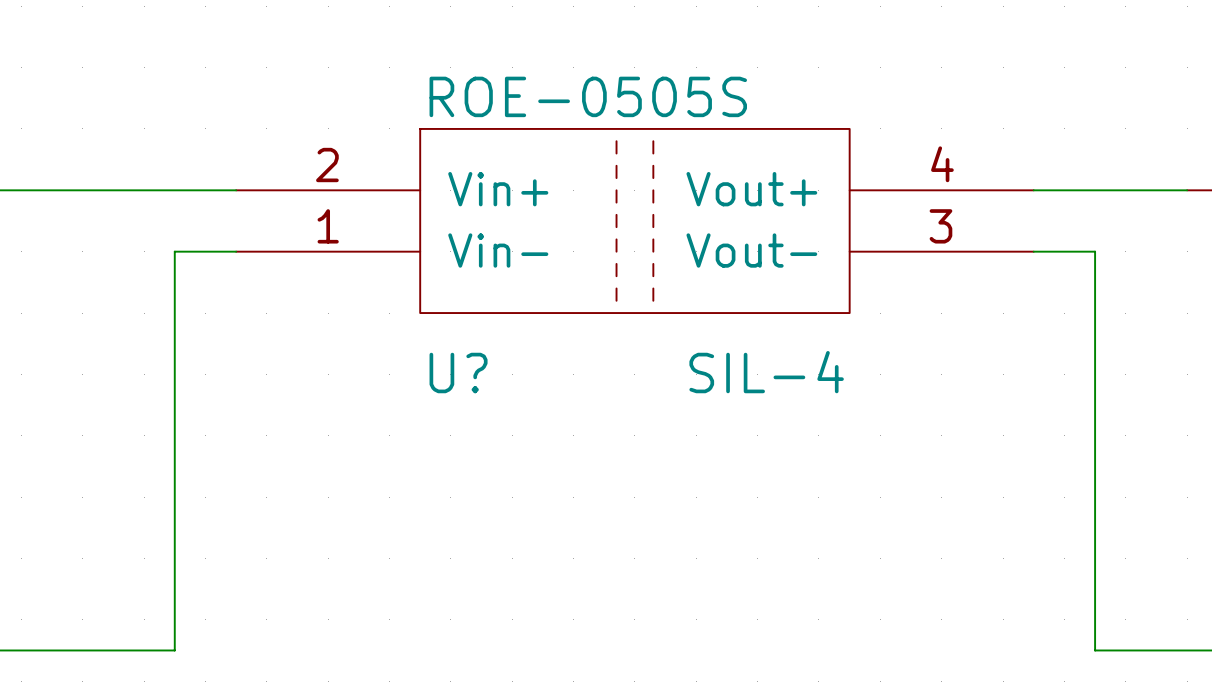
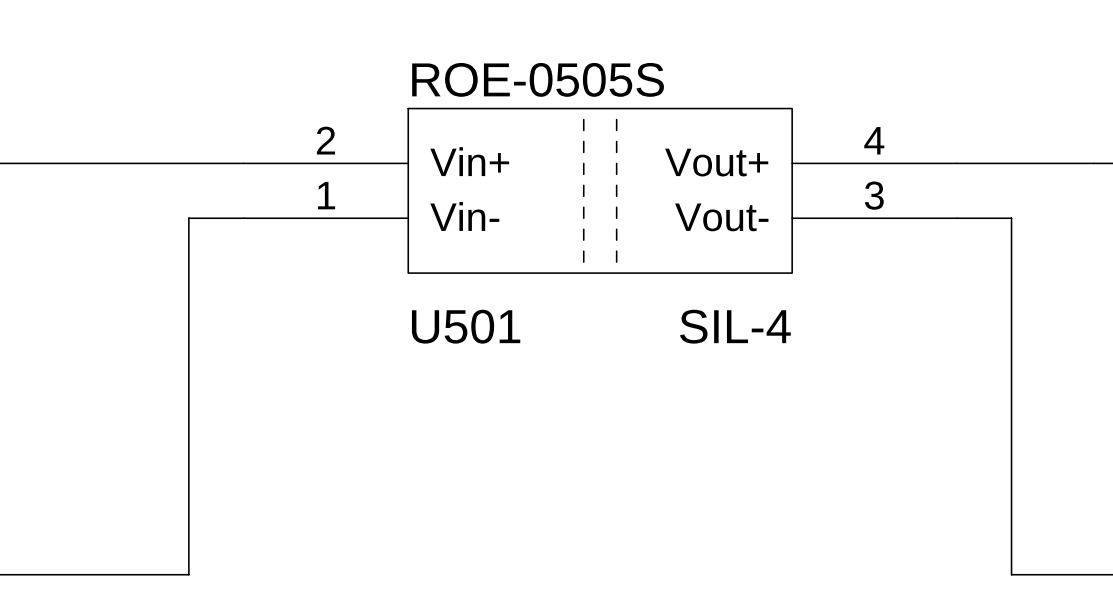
U? name: U? (458, 373) -> U501 (466, 326)

